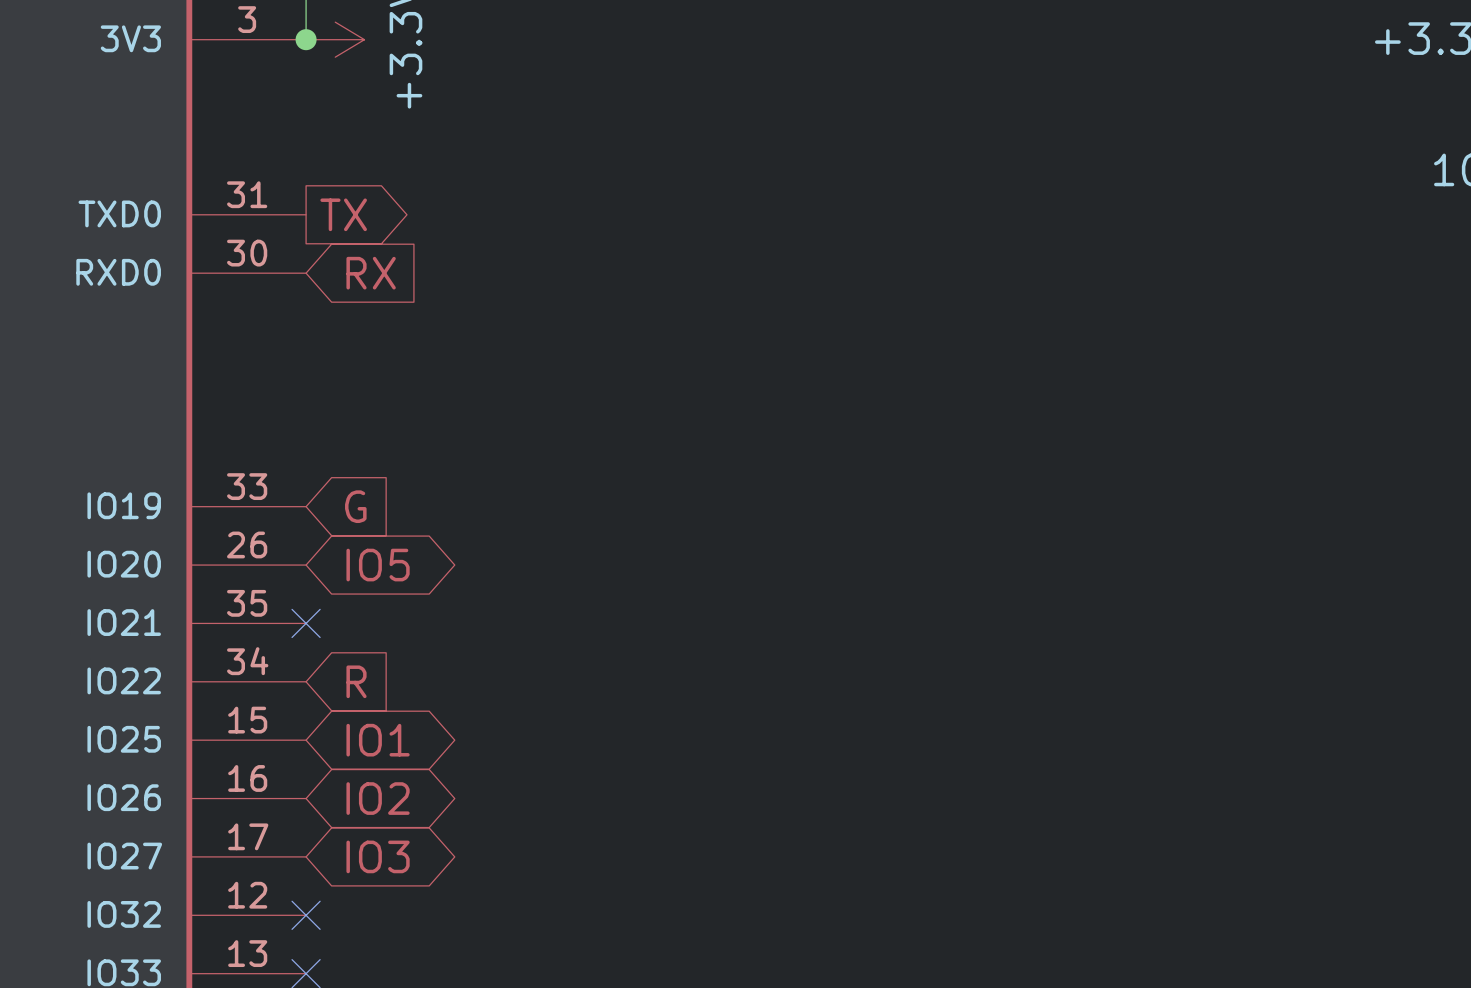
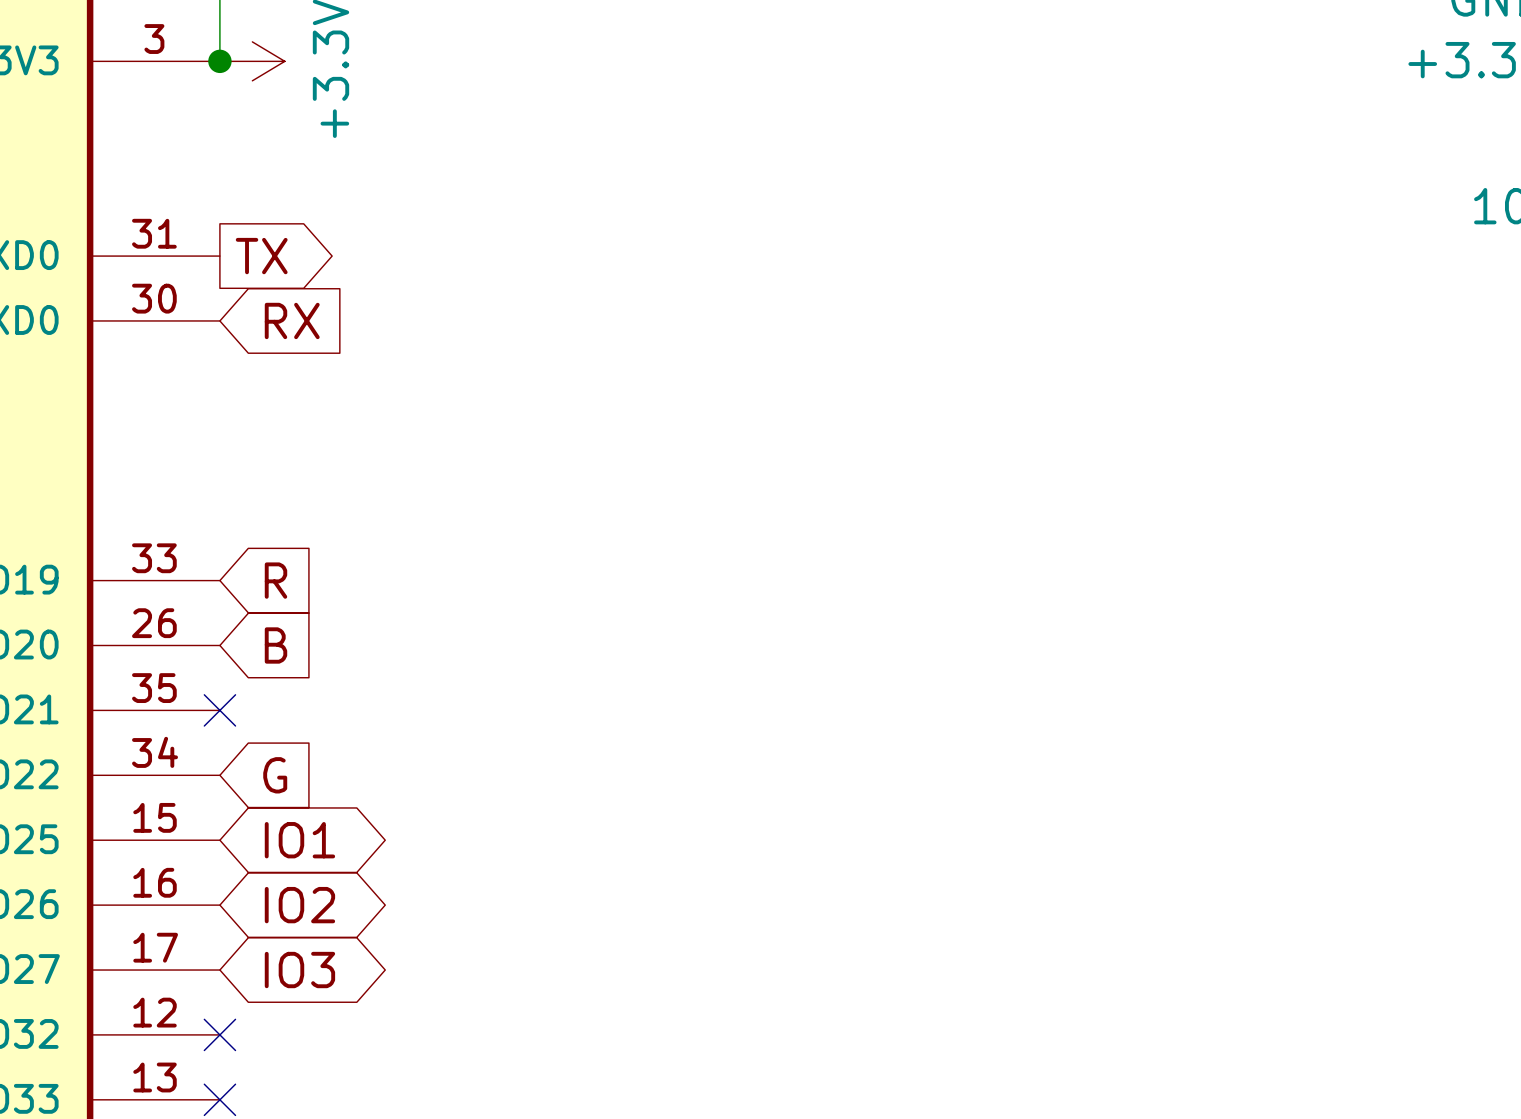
global label: G (355, 506) -> R (275, 580)
global label shape: bidirectional (378, 565) -> input (275, 645)
global label: IO5 (378, 565) -> B (275, 645)
global label: R (356, 681) -> G (275, 775)

